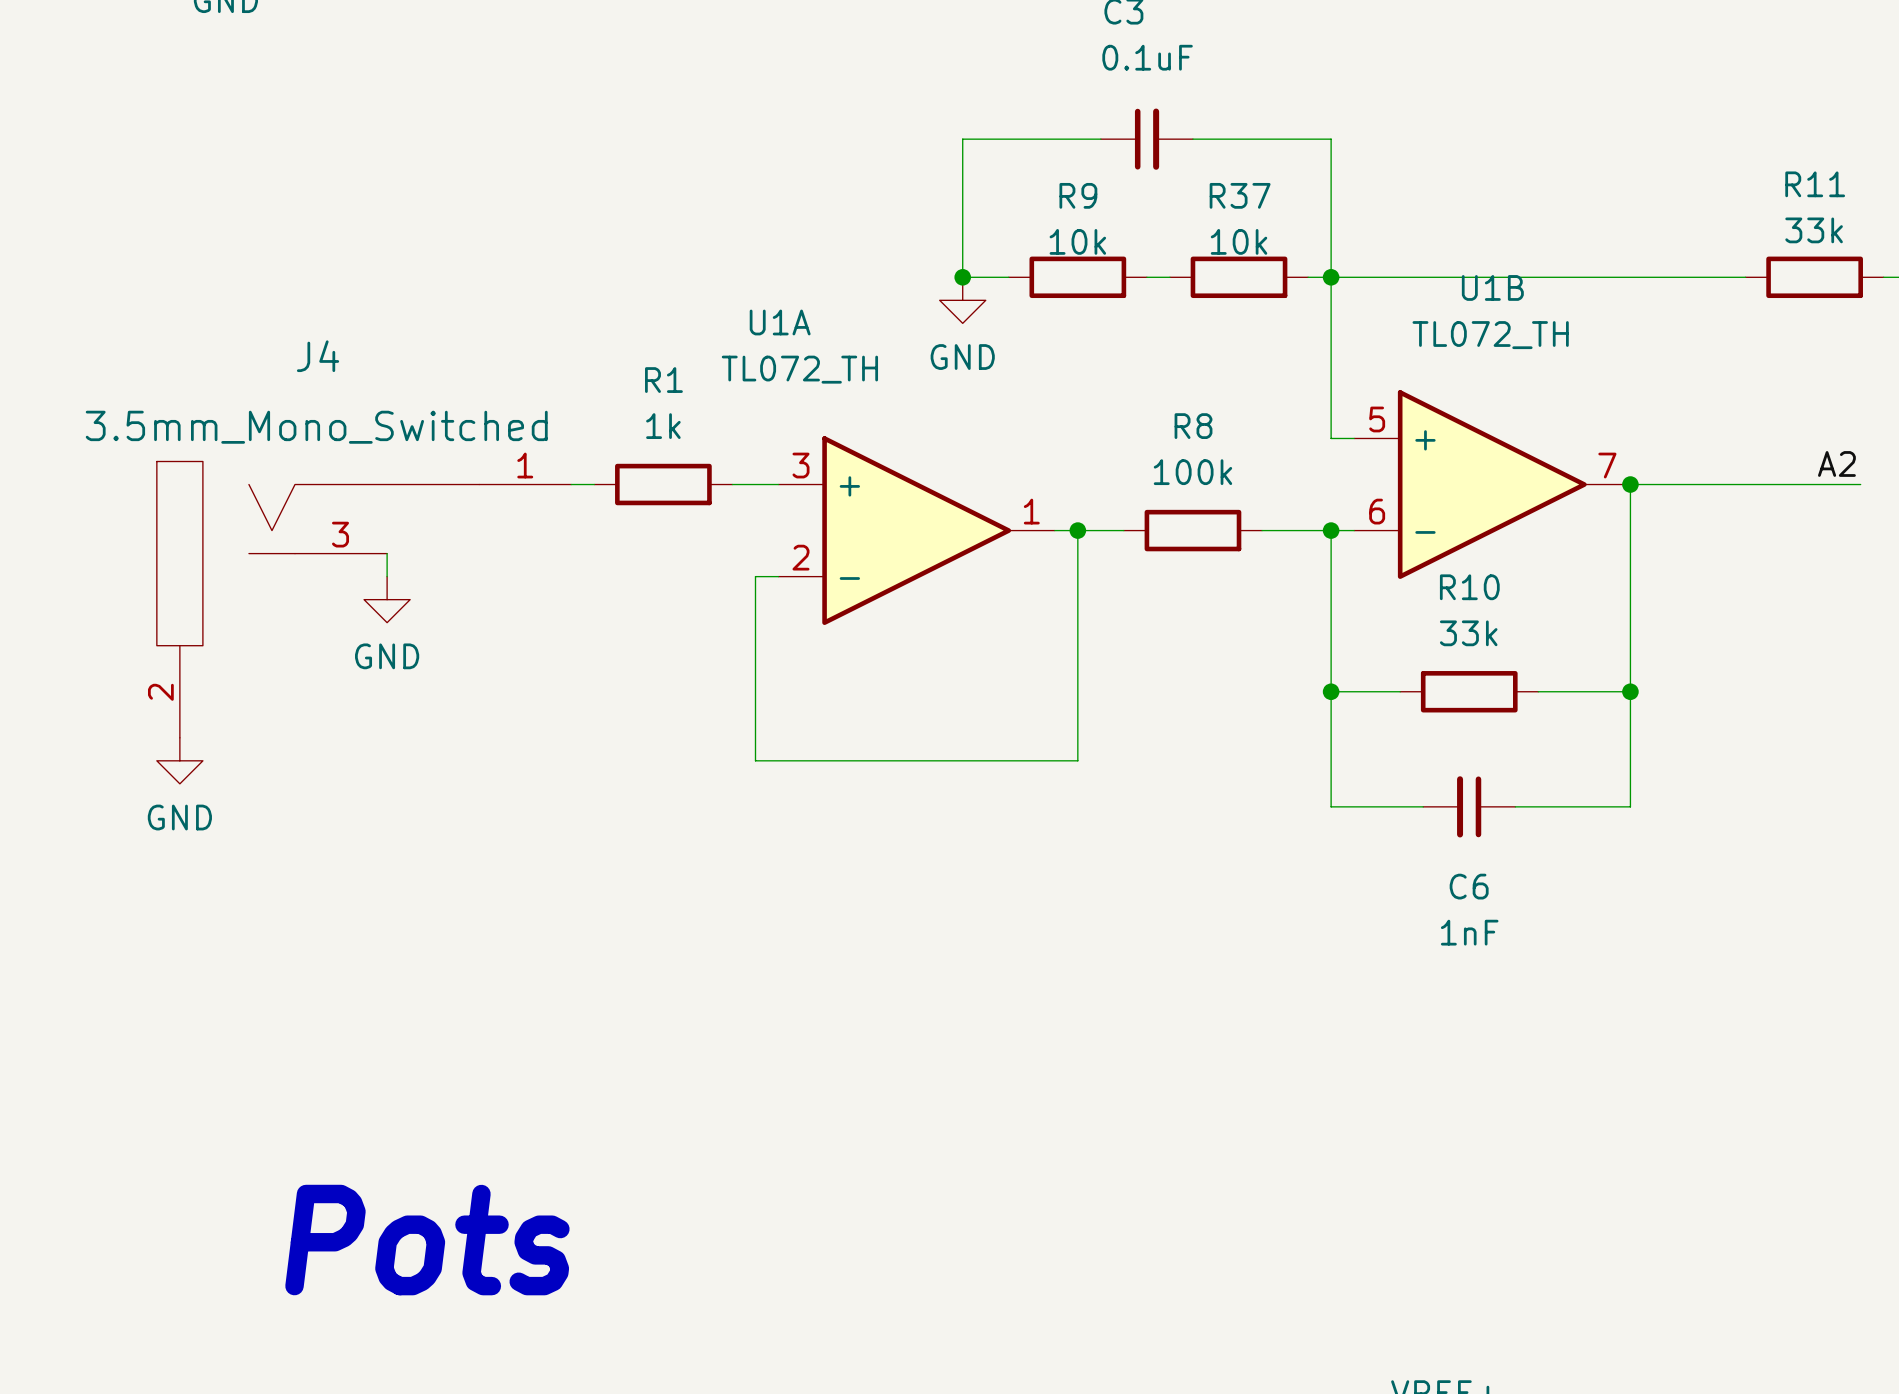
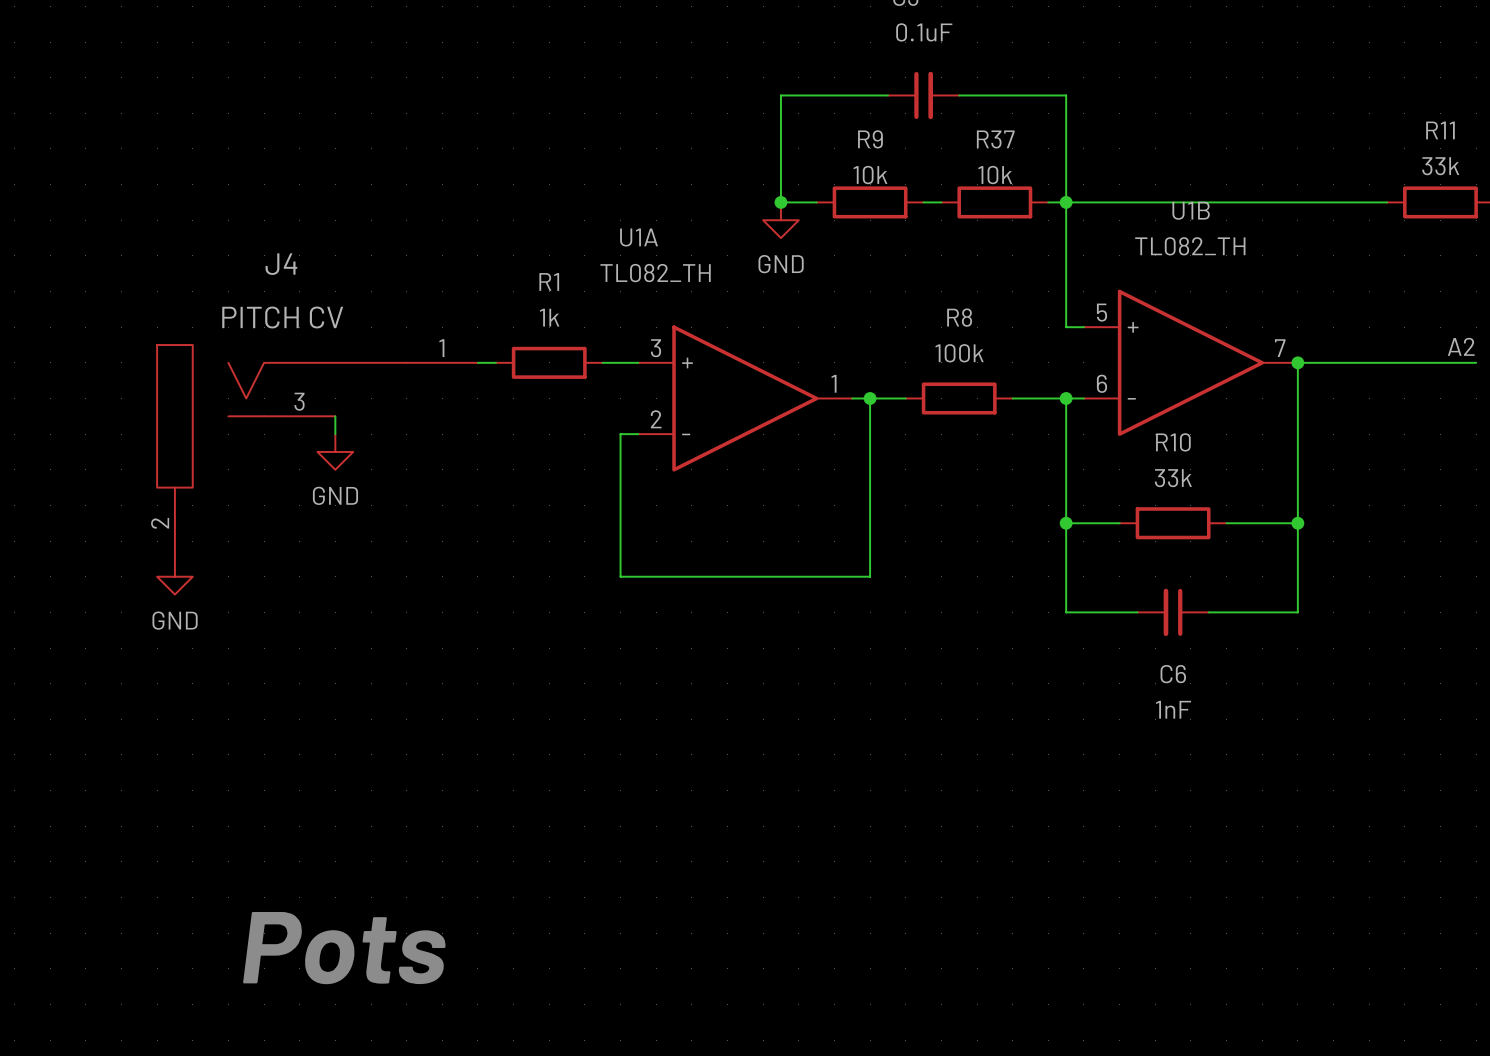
U1B value: TL072_TH (1490, 335) -> TL082_TH (1190, 246)
U1A value: TL072_TH (799, 369) -> TL082_TH (655, 273)
J4 value: 3.5mm_Mono_Switched (316, 427) -> PITCH CV (282, 317)

